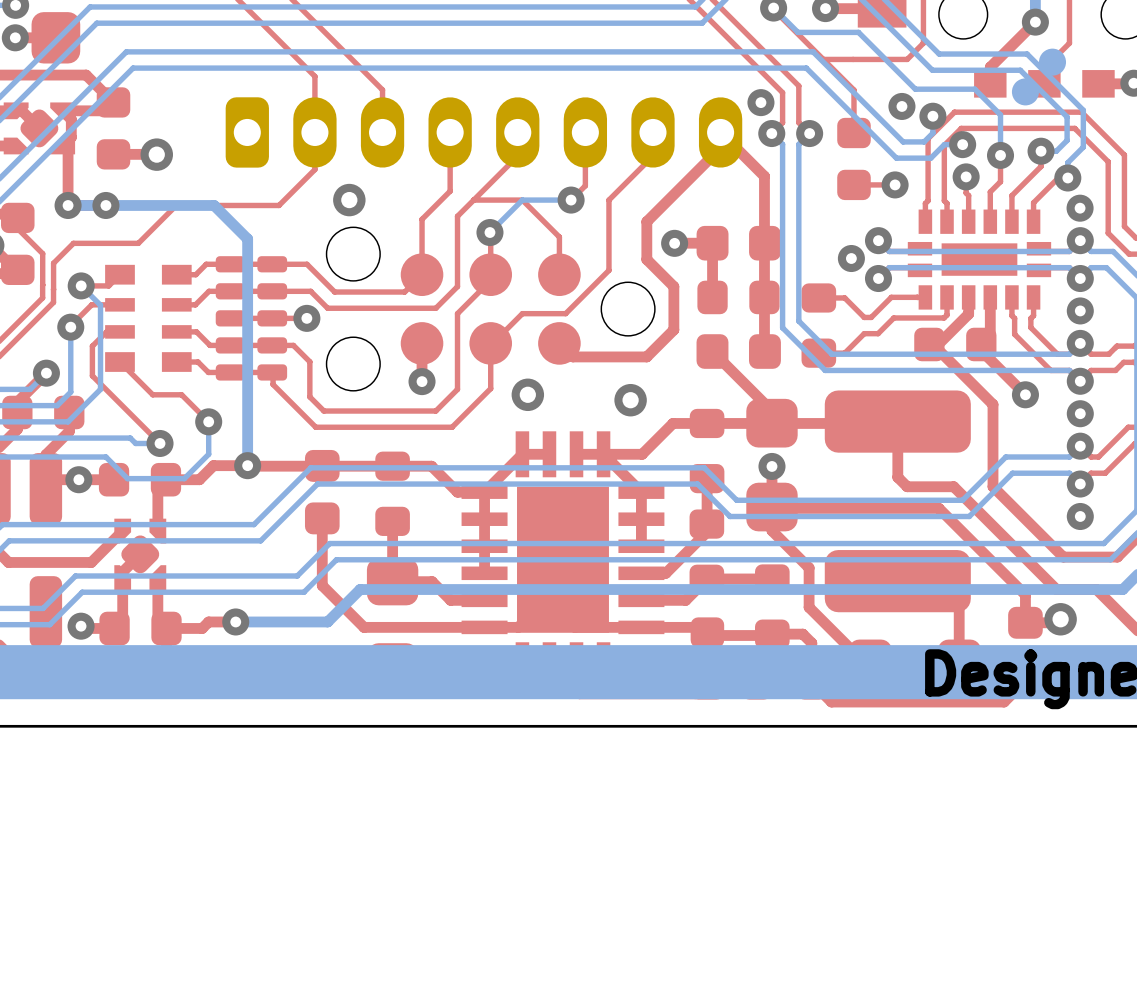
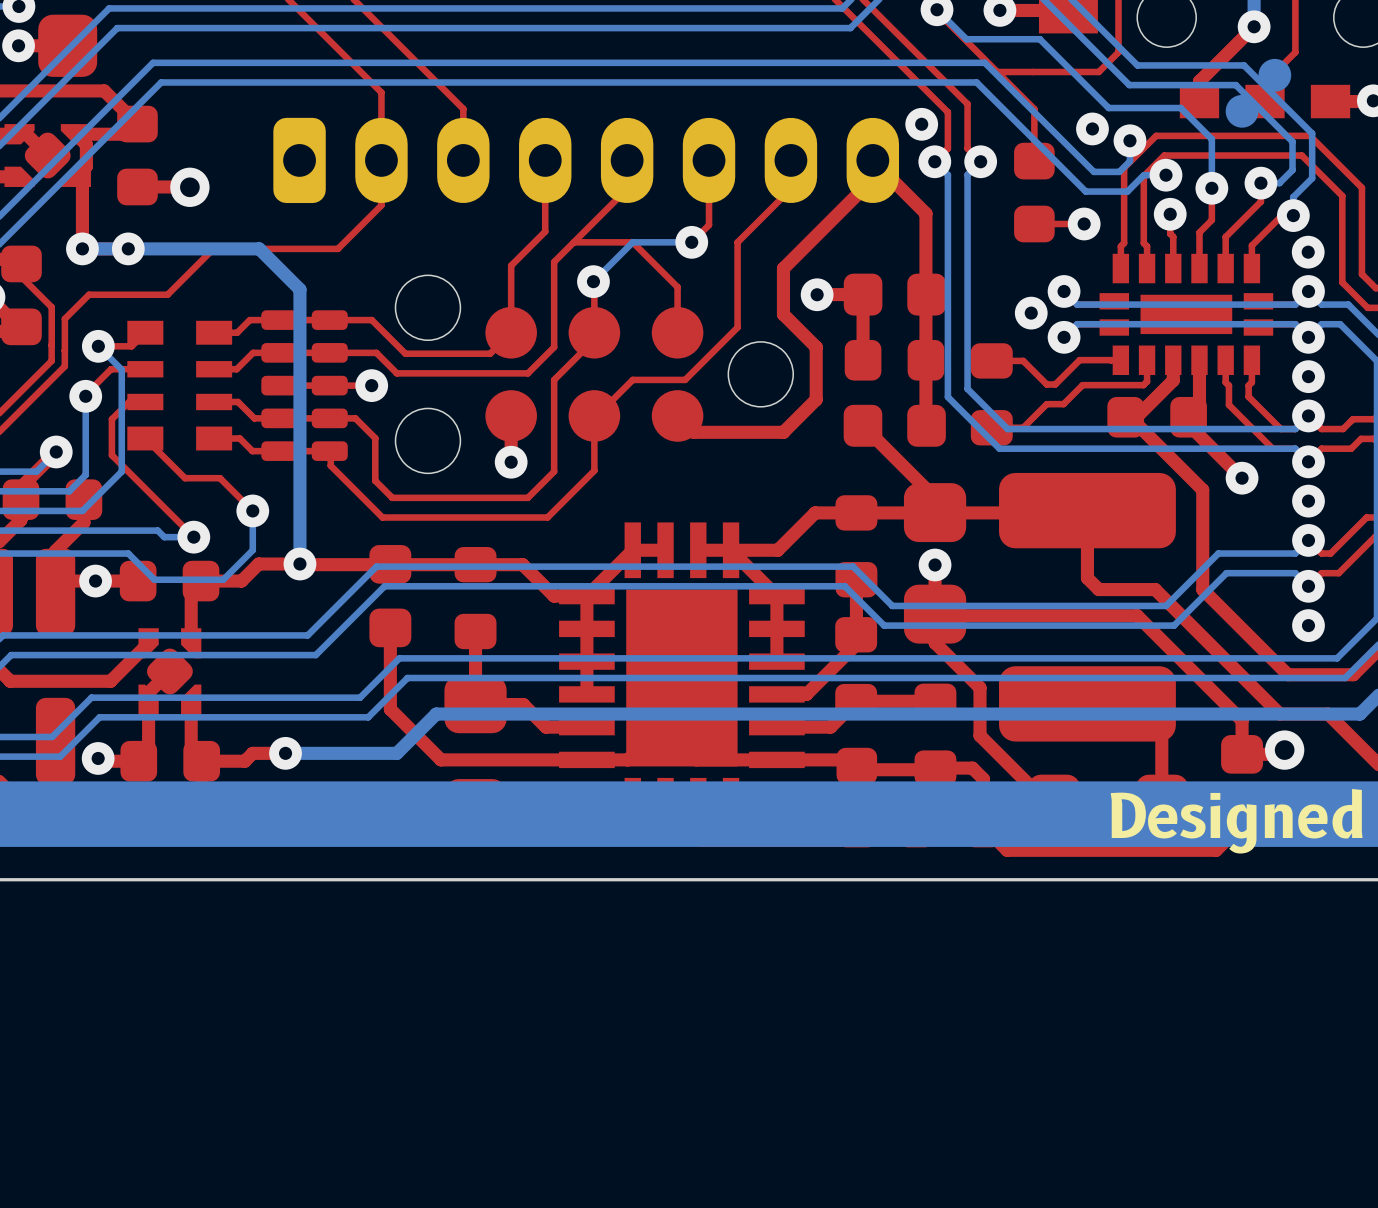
via: (349, 200) -> none
via: (527, 394) -> none
via: (630, 400) -> none

